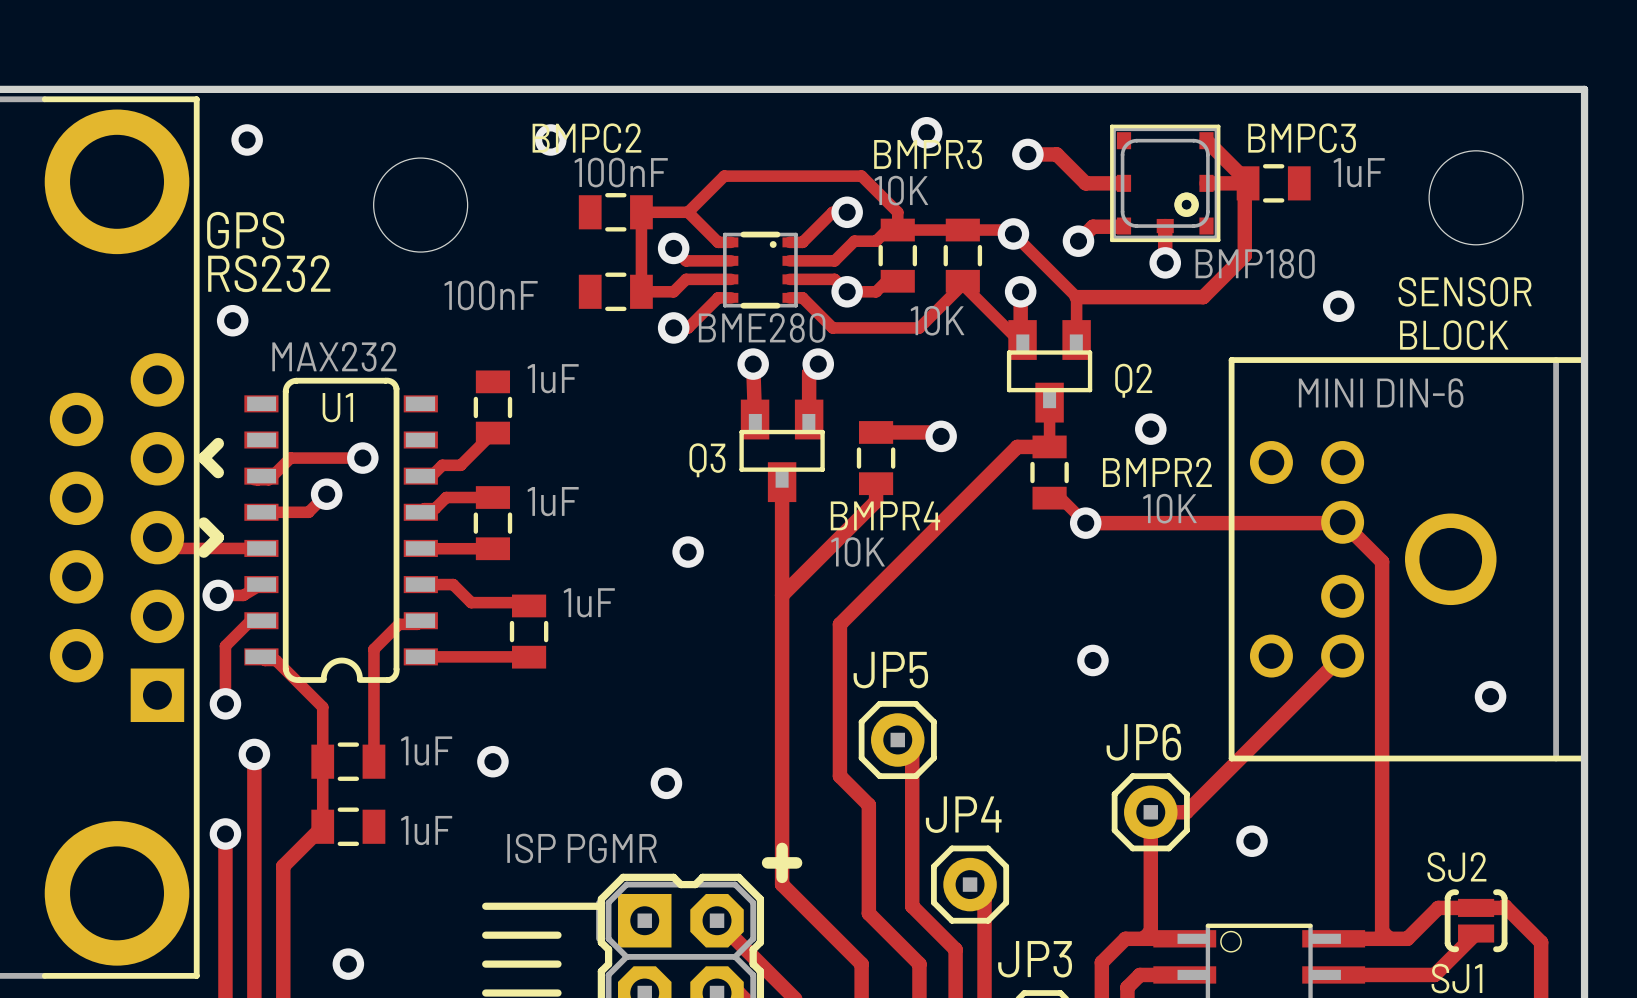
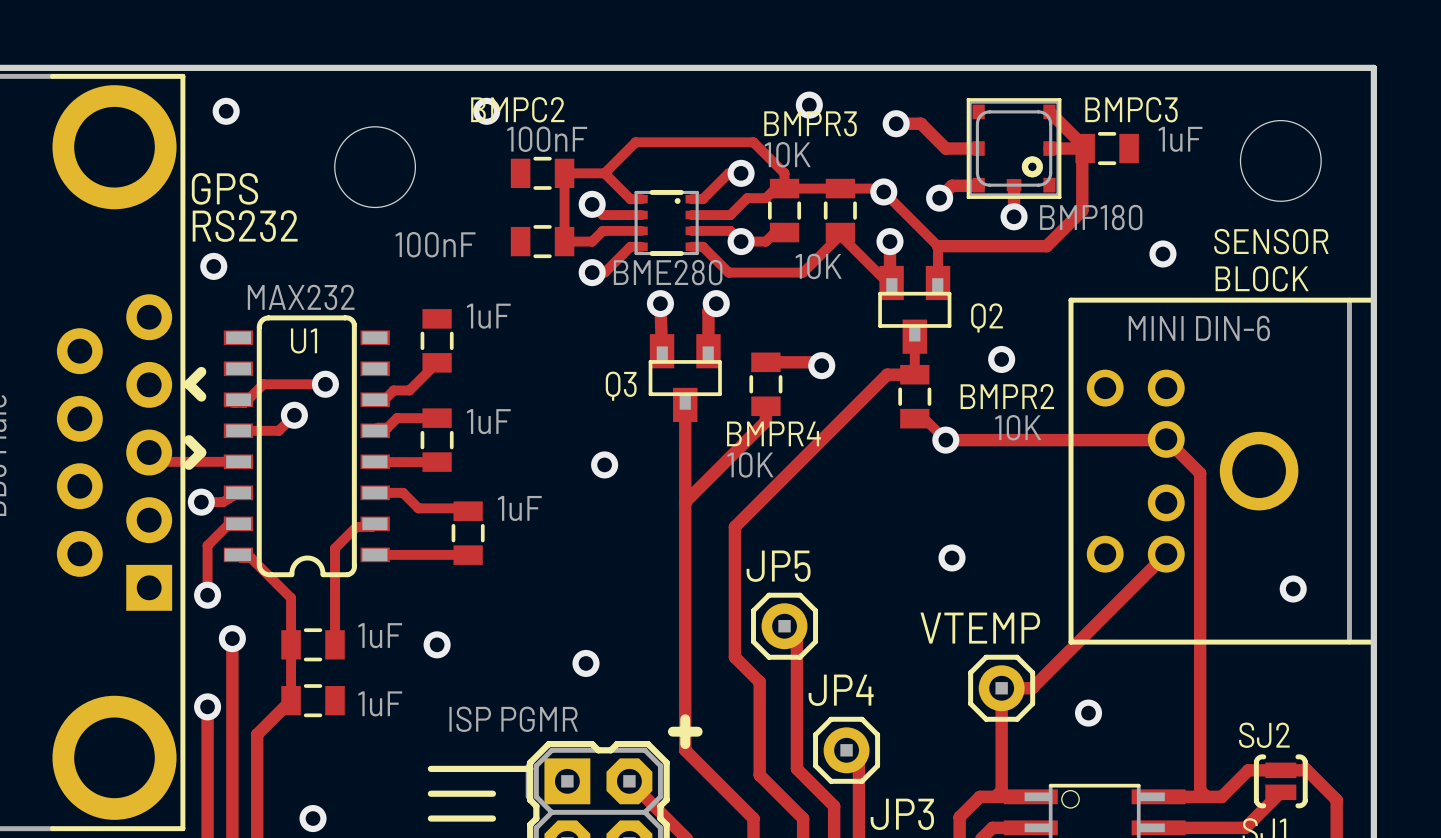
JP6 name: JP6 (1143, 742) -> VTEMP (980, 628)

